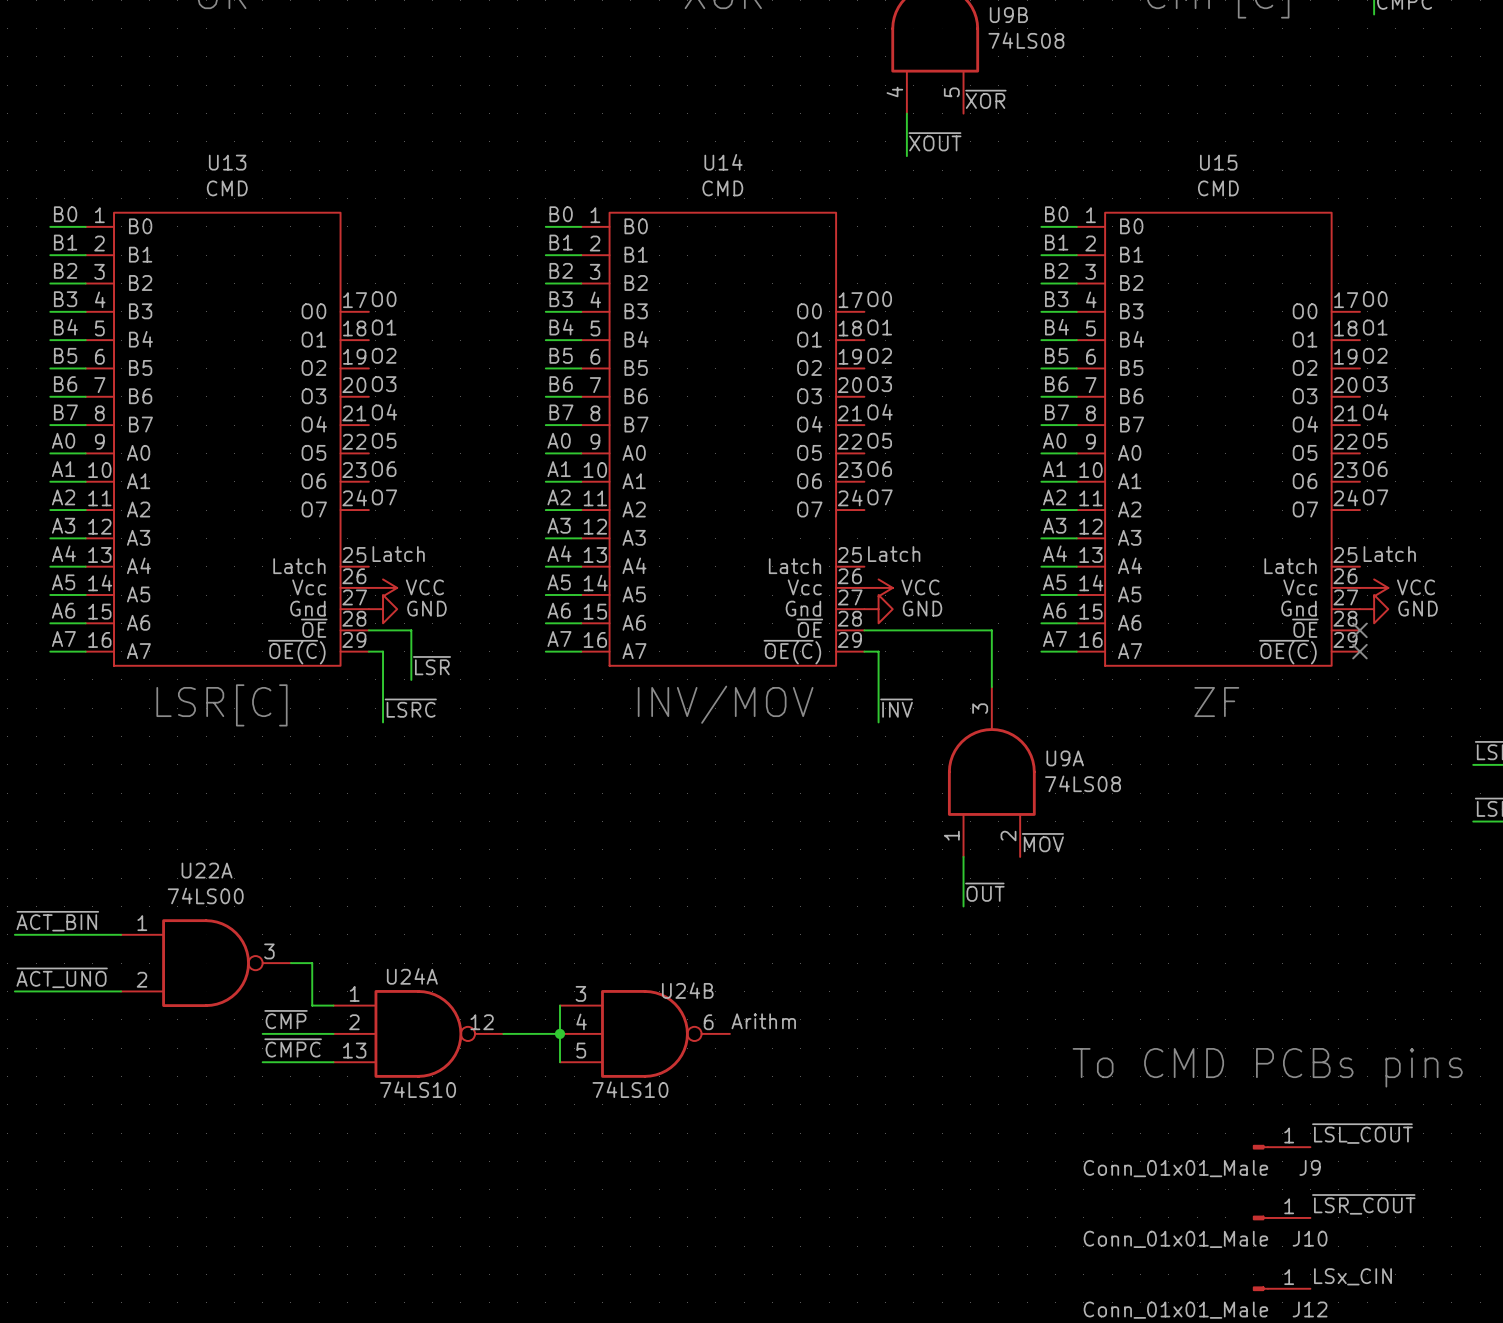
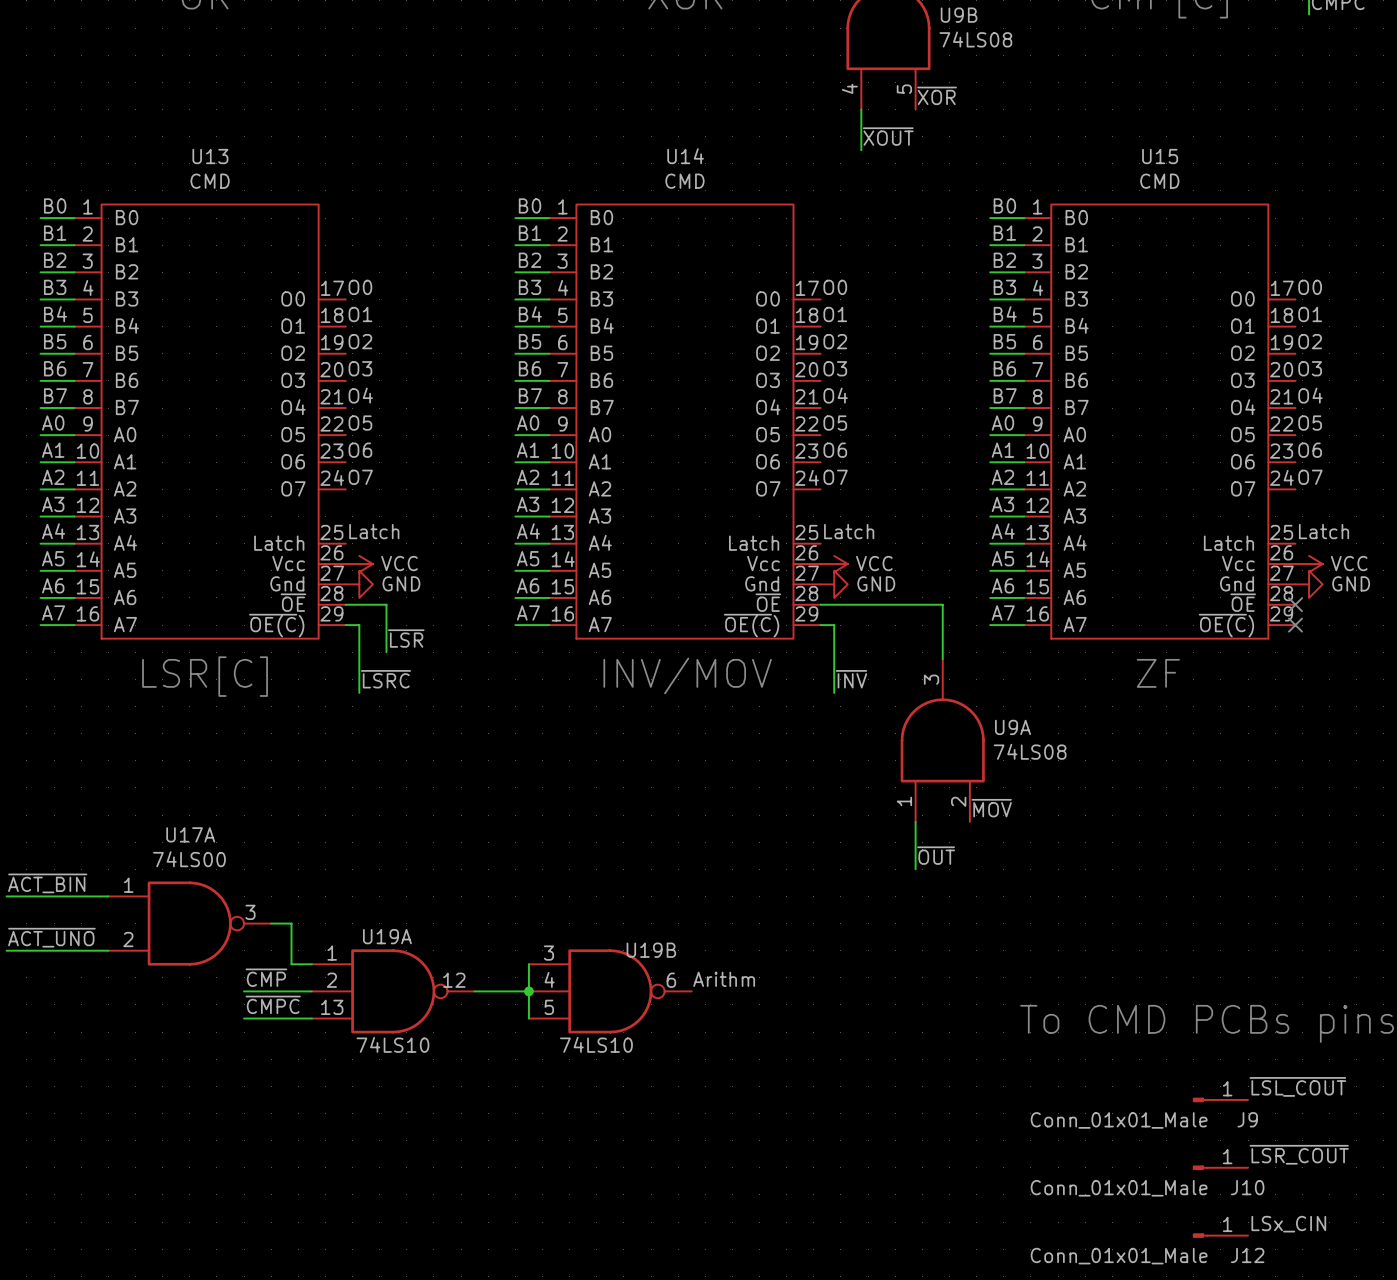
U22A name: U22A (207, 870) -> U17A (190, 834)
U24A name: U24A (412, 976) -> U19A (387, 936)
U24B name: U24B (687, 990) -> U19B (651, 950)

